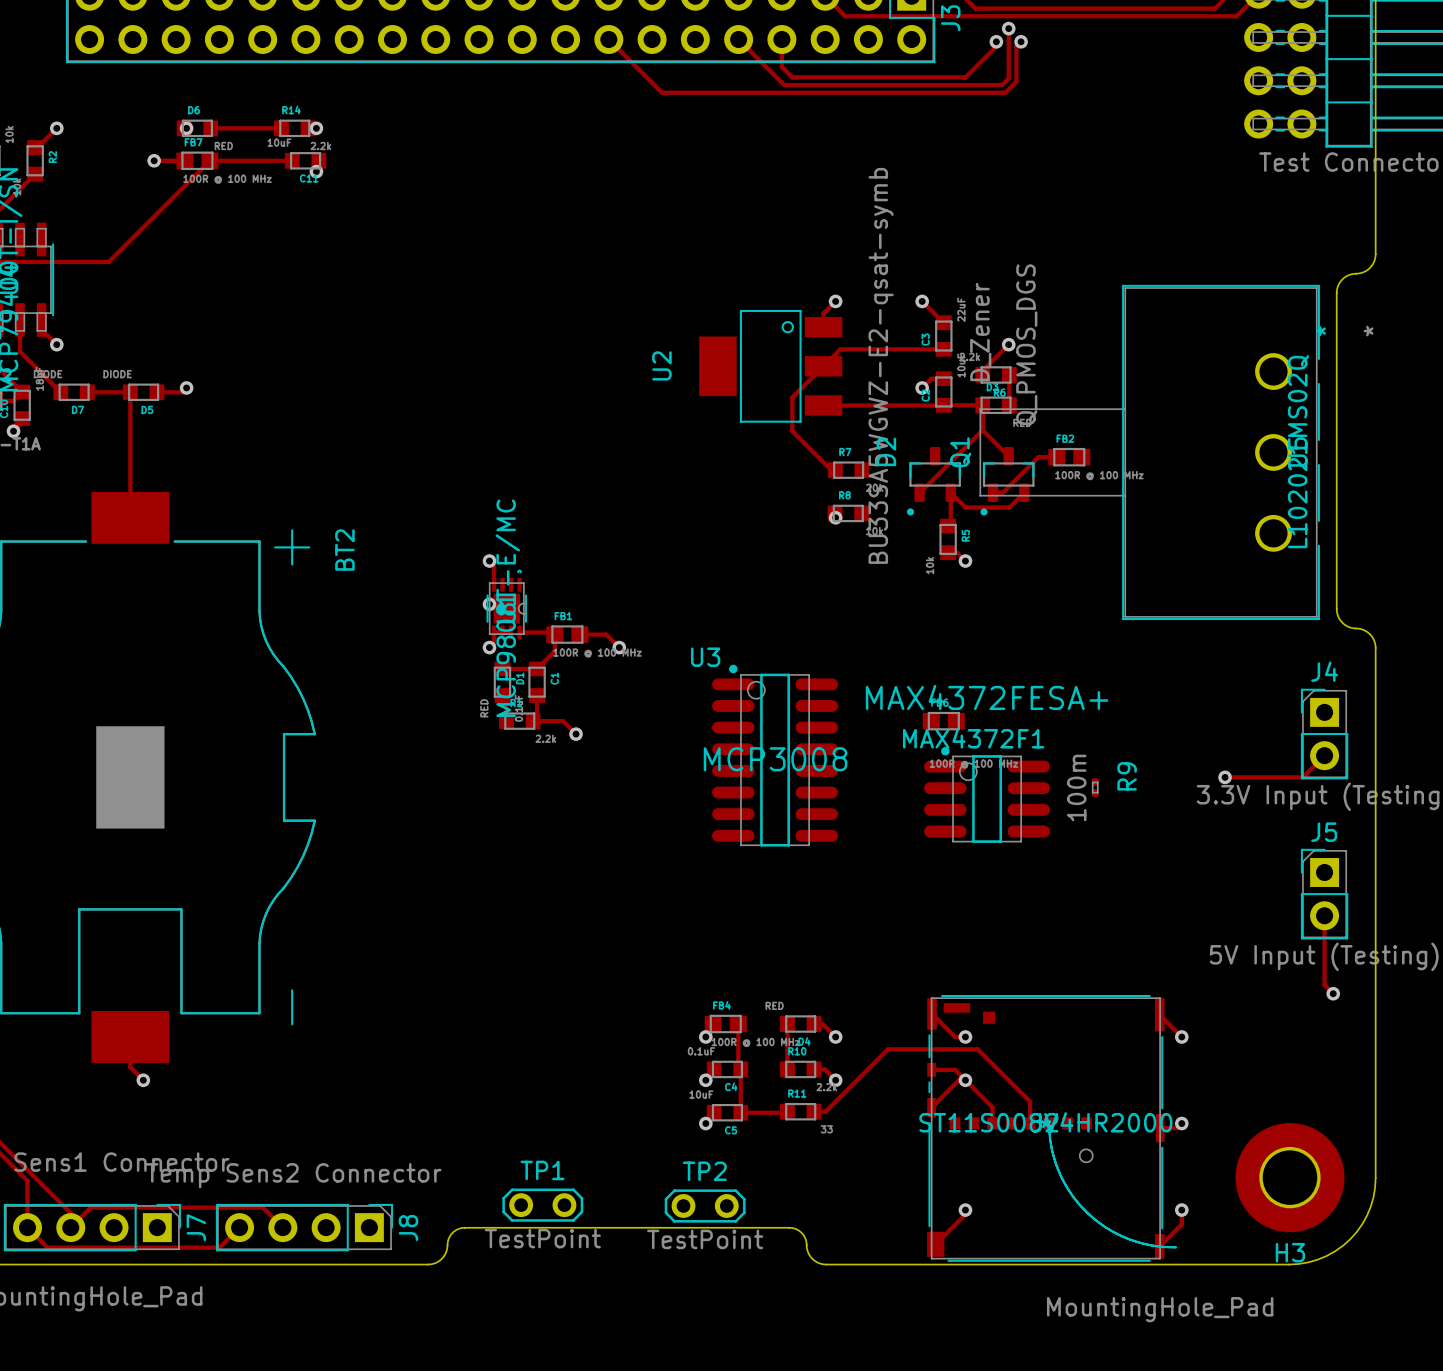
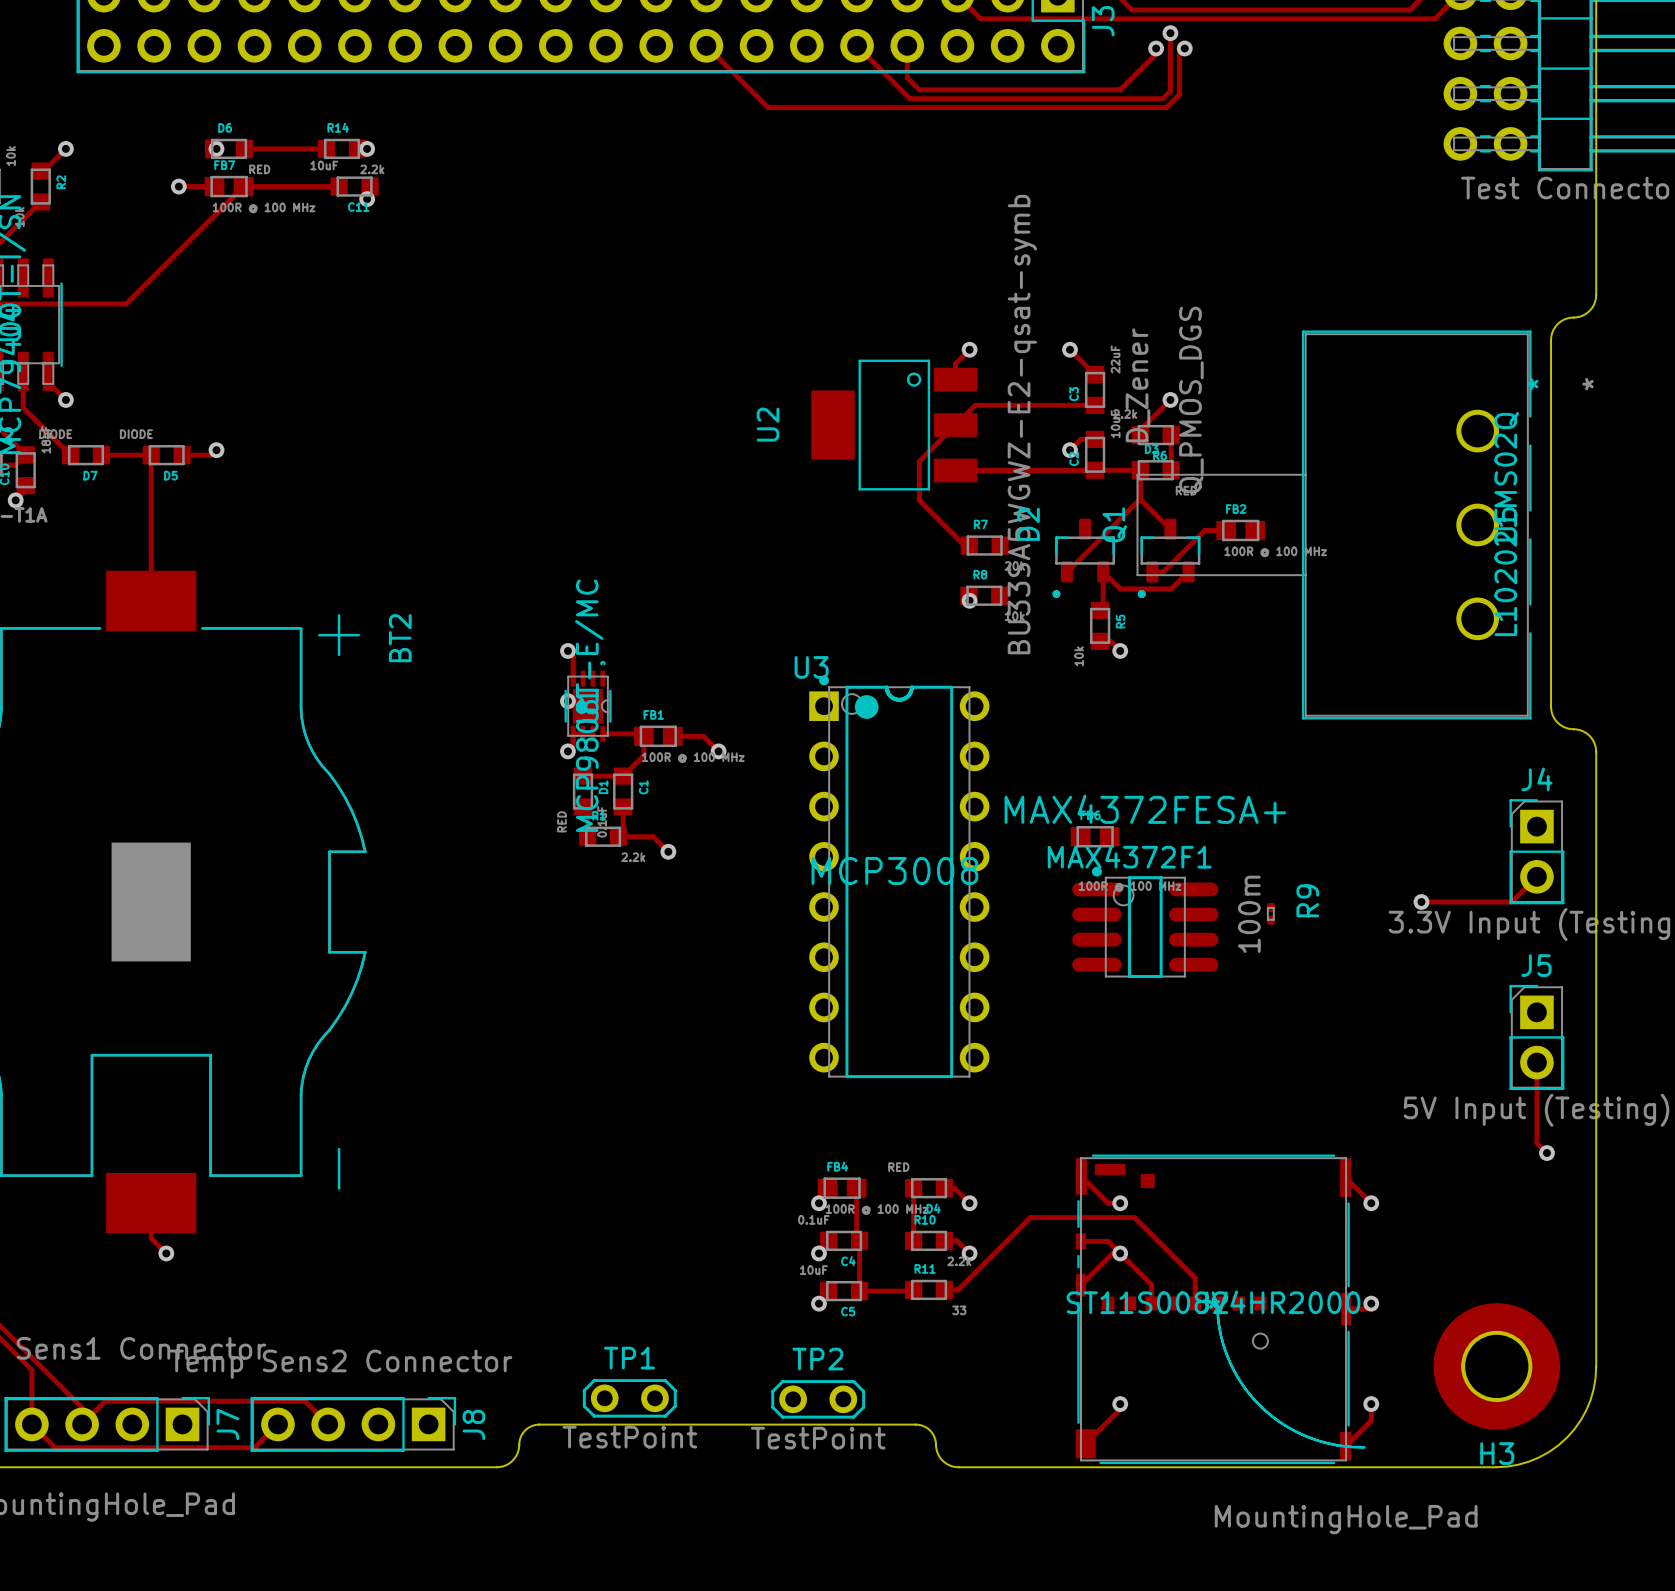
U3 name position: U3 (705, 657) -> U3 (811, 667)
U3 footprint: [712, 664, 839, 847] -> [809, 675, 990, 1079]

